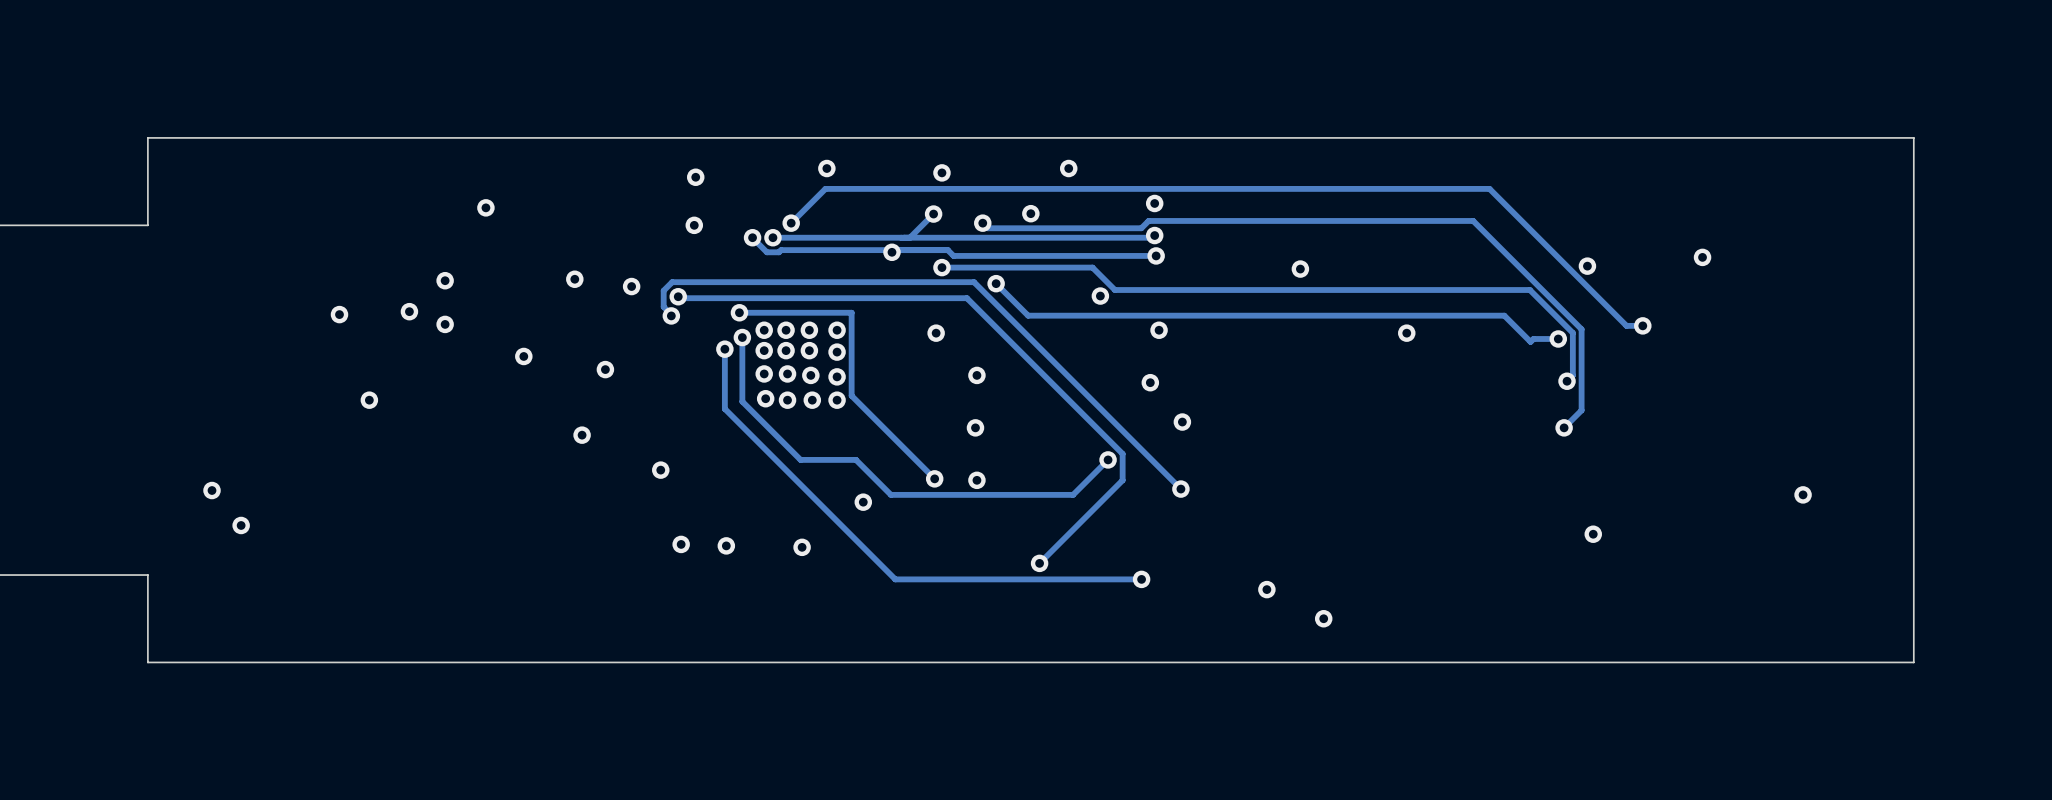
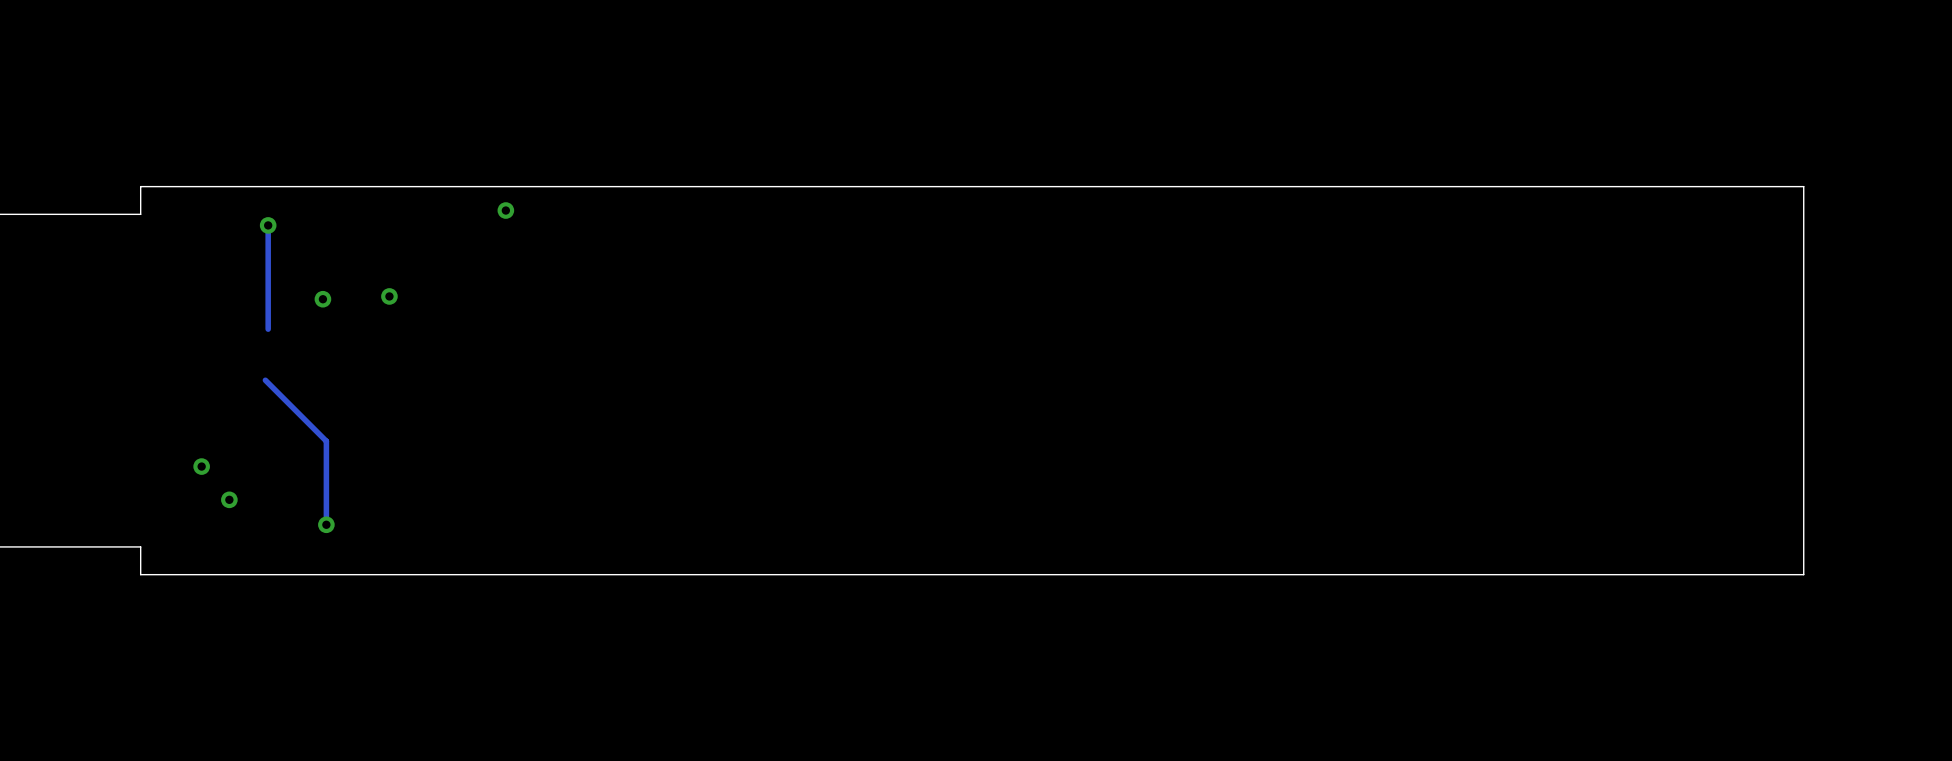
via: (826, 168) -> none
via: (1068, 168) -> none
via: (941, 172) -> none
via: (695, 177) -> none
board edge: (147, 196) (147, 137) (1913, 137) (1913, 662) (147, 662) (147, 604) -> (140, 186) (1803, 186) (1803, 574) (140, 574)
via: (1154, 203) -> none
via: (485, 207) -> none
via: (1030, 213) -> none
track: (933, 214) (909, 237) -> none
via: (933, 214) -> none
via: none -> (505, 210)
track: (791, 223) (825, 188) (1489, 188) (1626, 325) (1642, 325) -> none
via: (791, 223) -> none
track: (982, 223) (987, 228) (1141, 228) (1148, 220) (1473, 220) (1581, 329) (1581, 410) (1564, 427) -> none
via: (982, 223) -> none
via: (694, 225) -> none
track: (1154, 235) (1152, 237) (772, 237) -> none
via: (1154, 235) -> none
track: none -> (268, 225) (268, 329)
via: none -> (268, 225)
track: (752, 237) (766, 252) (778, 252) (781, 250) (947, 250) (953, 255) (1156, 255) -> none
via: (752, 237) -> none
via: (772, 237) -> none
via: (891, 252) -> none
via: (1156, 255) -> none
via: (1702, 257) -> none
via: (1587, 266) -> none
track: (941, 267) (1092, 267) (1114, 290) (1529, 290) (1572, 332) (1572, 375) (1567, 381) -> none
via: (941, 267) -> none
via: (1300, 269) -> none
via: (574, 279) -> none
via: (445, 280) -> none
track: (996, 283) (1028, 315) (1504, 315) (1530, 341) (1533, 338) (1558, 338) -> none
via: (996, 283) -> none
via: (631, 286) -> none
track: (678, 296) (966, 298) (1122, 453) (1122, 480) (1039, 563) -> none
via: (678, 296) -> none
via: (1100, 296) -> none
track: (739, 312) (851, 312) (851, 395) (934, 478) -> none
via: (739, 312) -> none
track: (671, 315) (663, 306) (663, 290) (672, 282) (974, 282) (1180, 489) -> none
via: (671, 315) -> none
via: (445, 324) -> none
via: (1642, 325) -> none
via: (764, 330) -> none
via: (786, 330) -> none
via: (809, 330) -> none
via: (837, 330) -> none
via: (1159, 330) -> none
via: (936, 333) -> none
via: (1406, 333) -> none
track: (742, 337) (742, 401) (800, 459) (856, 459) (890, 494) (1073, 494) (1108, 459) -> none
via: (742, 337) -> none
via: (1558, 338) -> none
track: (724, 349) (724, 408) (895, 579) (1141, 579) -> none
via: (724, 349) -> none
via: (764, 350) -> none
via: (786, 350) -> none
via: (809, 350) -> none
via: (837, 352) -> none
via: (523, 356) -> none
via: (605, 369) -> none
via: (764, 373) -> none
via: (787, 373) -> none
via: (810, 375) -> none
via: (976, 375) -> none
via: (837, 376) -> none
via: (1567, 381) -> none
via: (1150, 382) -> none
via: (765, 398) -> none
track: none -> (265, 380) (326, 441) (326, 524)
via: (369, 400) -> none
via: (787, 400) -> none
via: (812, 400) -> none
via: (837, 400) -> none
via: (1182, 422) -> none
via: (975, 427) -> none
via: (1564, 427) -> none
via: (582, 435) -> none
via: (1108, 459) -> none
via: (660, 470) -> none
via: (934, 478) -> none
via: (976, 480) -> none
via: (1180, 489) -> none
via: (1803, 494) -> none
via: (863, 502) -> none
via: (1593, 534) -> none
via: (681, 544) -> none
via: (726, 545) -> none
via: (802, 547) -> none
via: none -> (326, 524)
via: (1039, 563) -> none
via: (1141, 579) -> none
via: (1266, 589) -> none
via: (1323, 618) -> none

